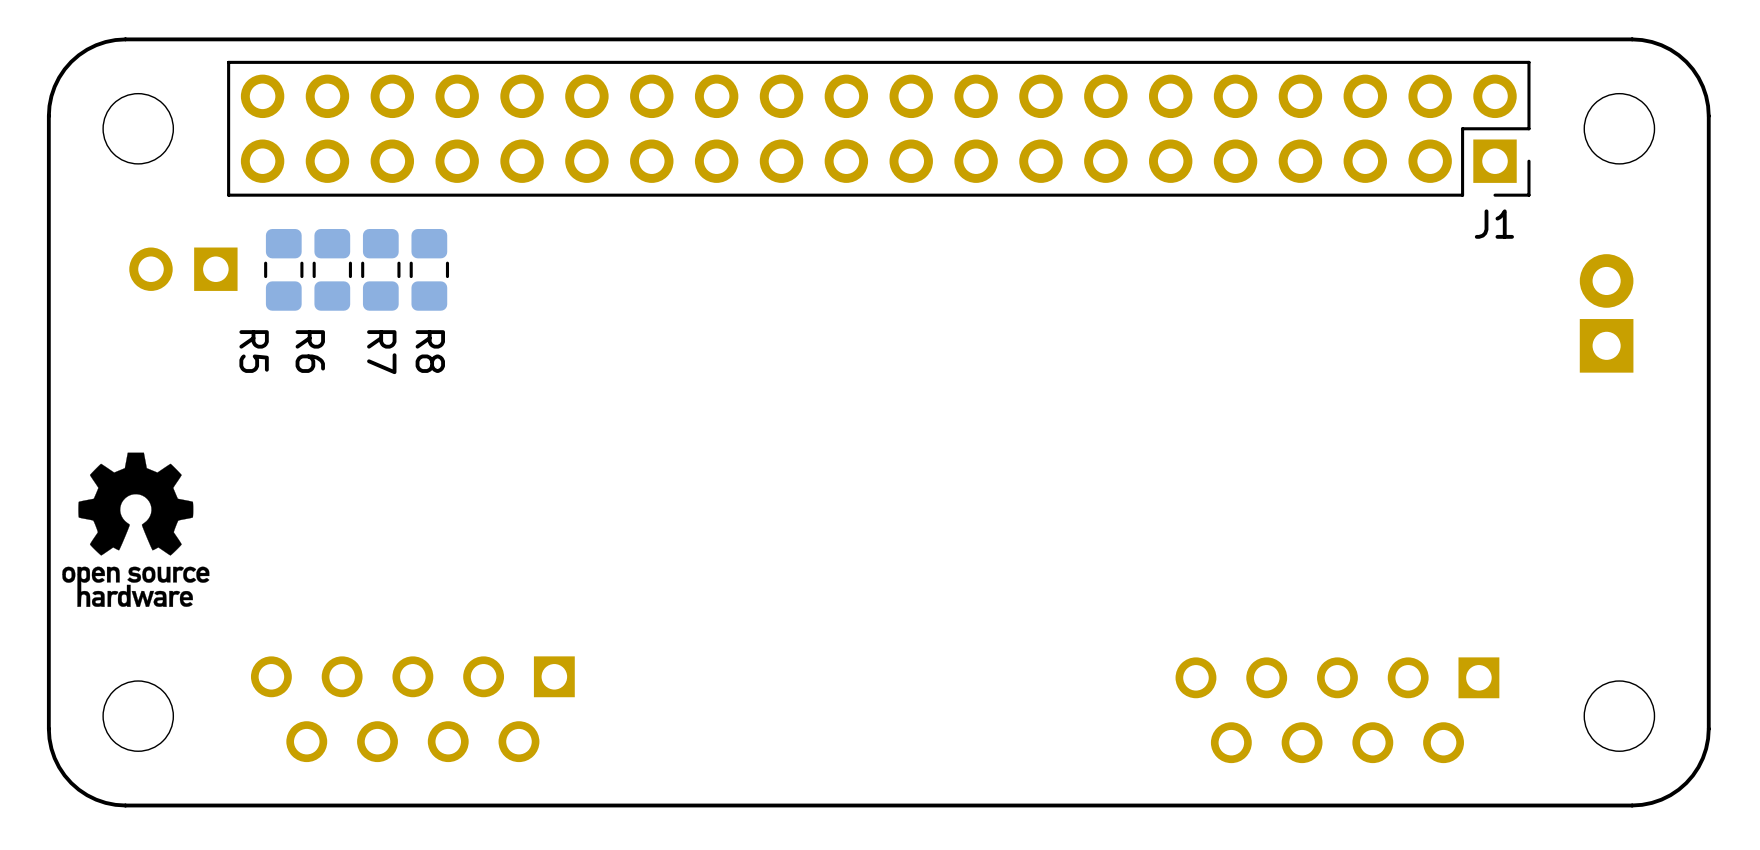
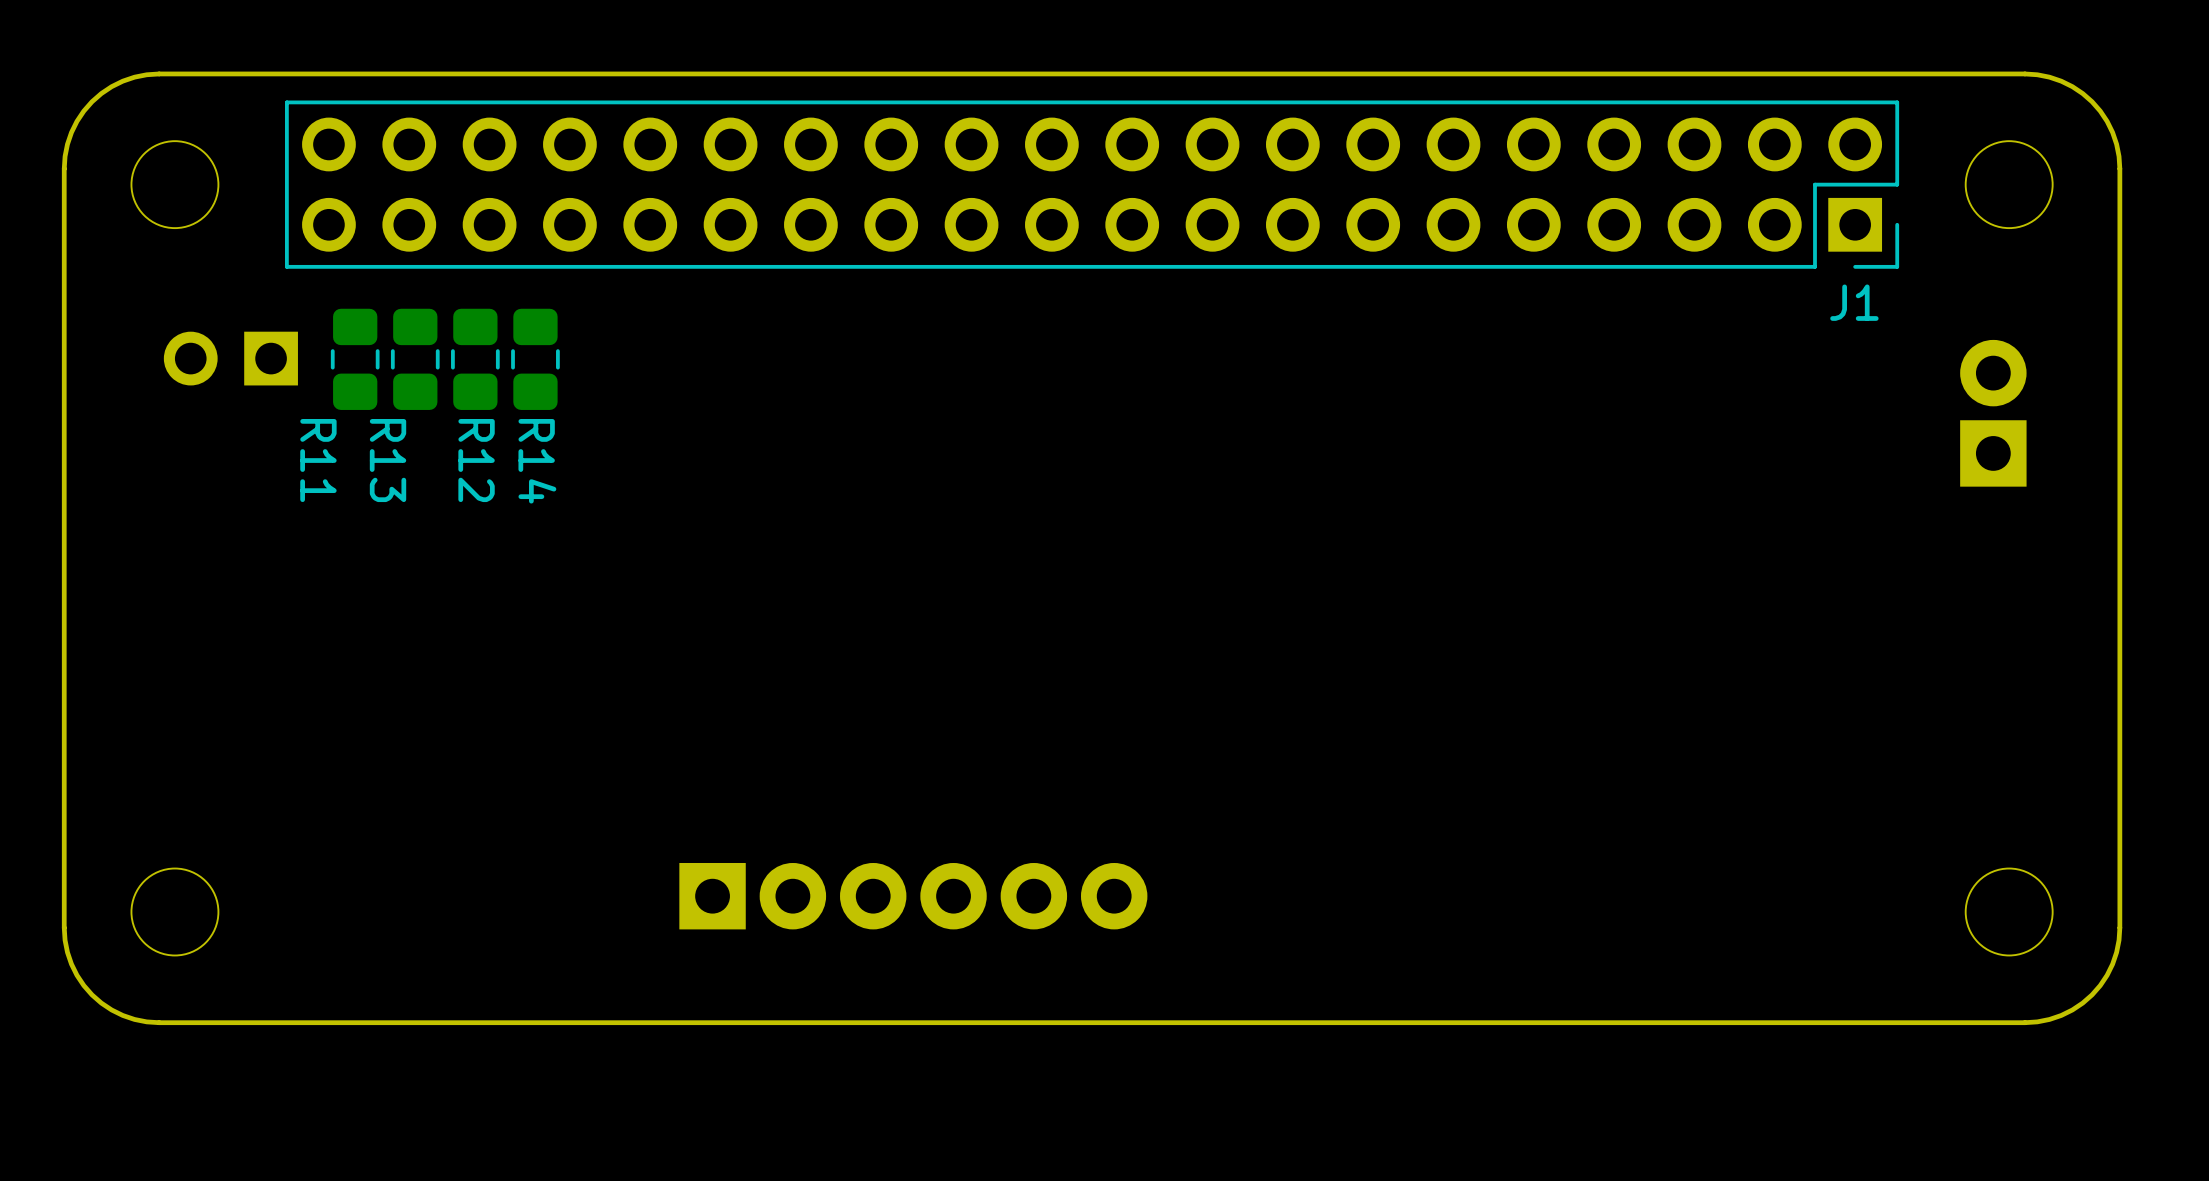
R5 name: R5 (254, 351) -> R11 (318, 460)
R6 name: R6 (310, 351) -> R13 (388, 460)
R8 name: R8 (430, 351) -> R14 (537, 461)
R7 name: R7 (381, 352) -> R12 (476, 460)
drawing: [62, 452, 210, 607] -> none
part: none -> (913, 896)
part: (412, 709) -> none
part: (1337, 710) -> none

